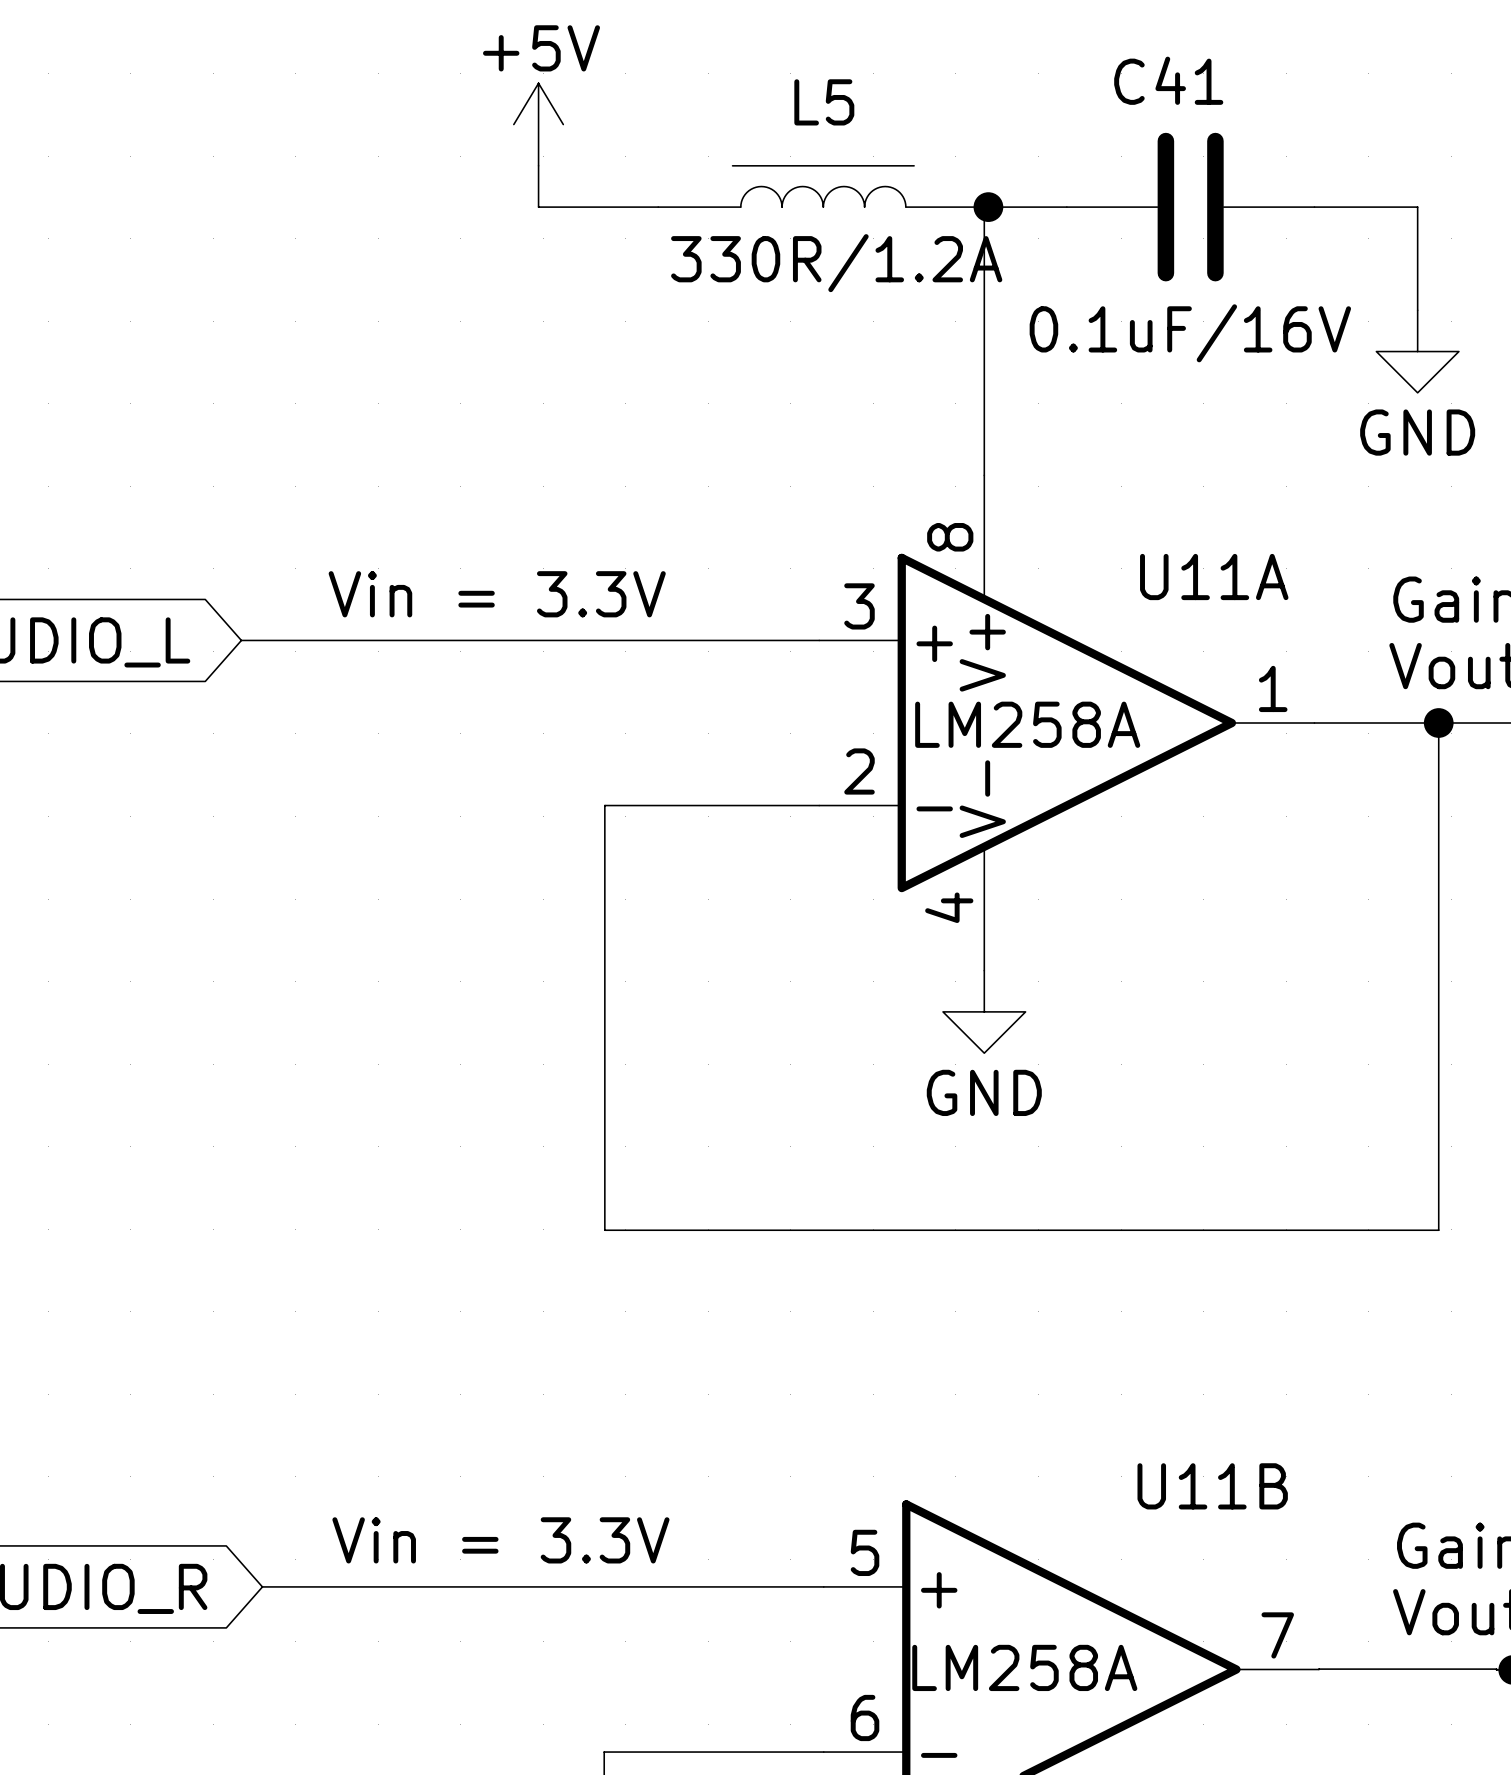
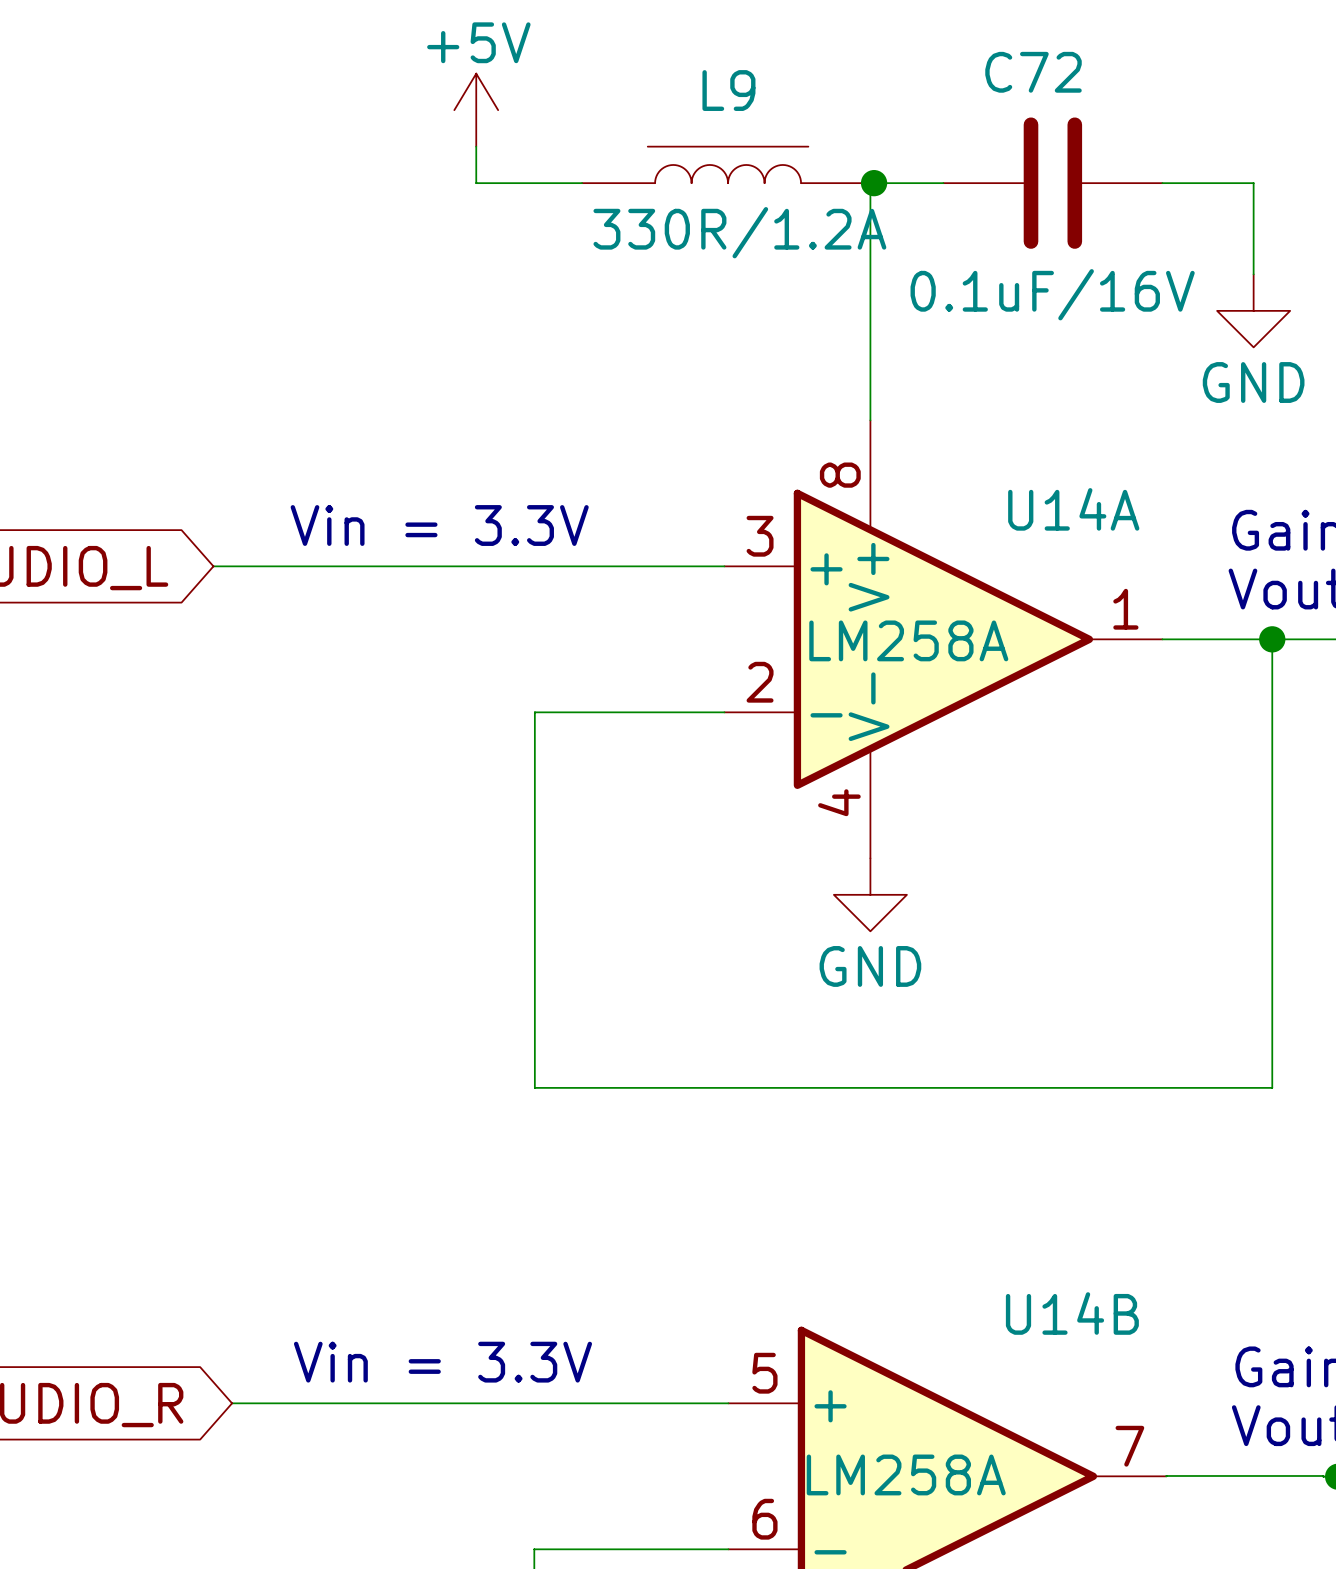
C41 name: C41 (1168, 80) -> C72 (1033, 72)
L5 name: L5 (824, 102) -> L9 (728, 90)
U11A name: U11A (1214, 577) -> U14A (1073, 509)
U11B name: U11B (1212, 1486) -> U14B (1072, 1313)

